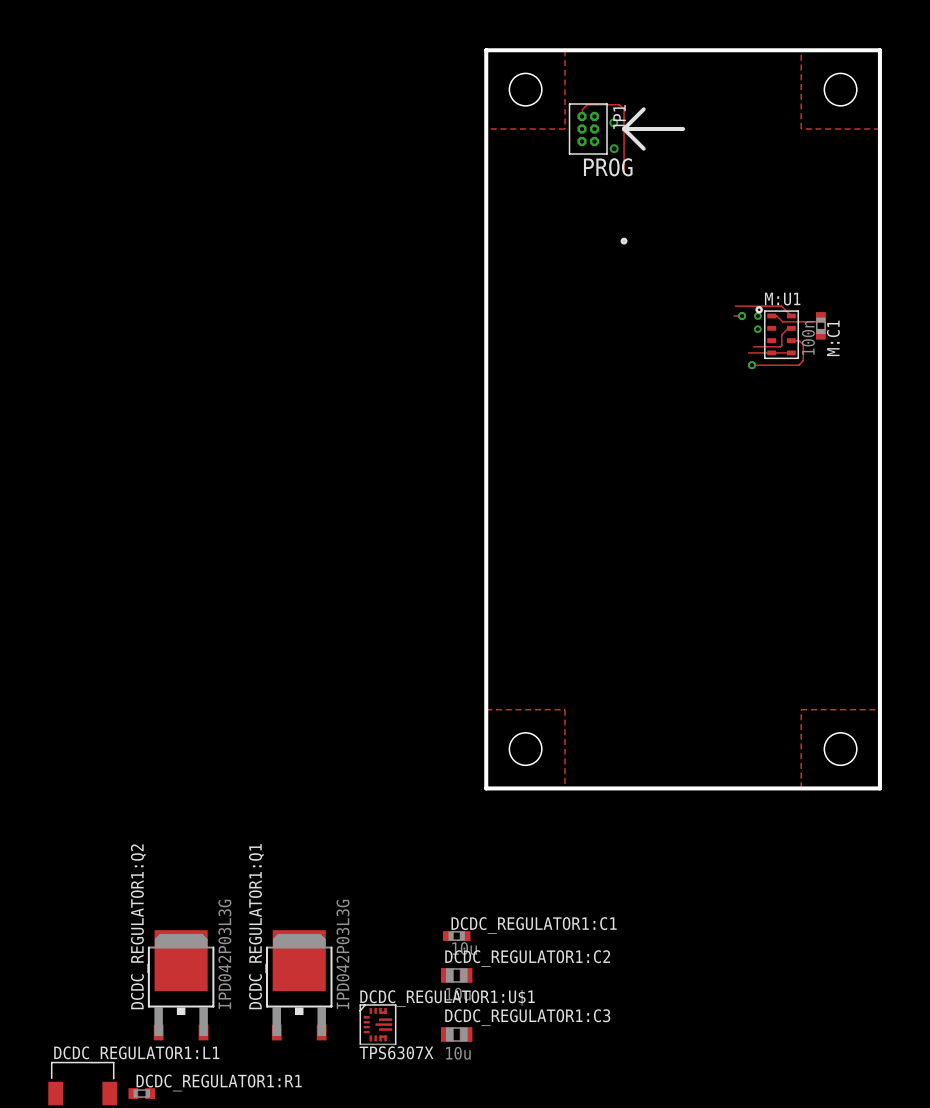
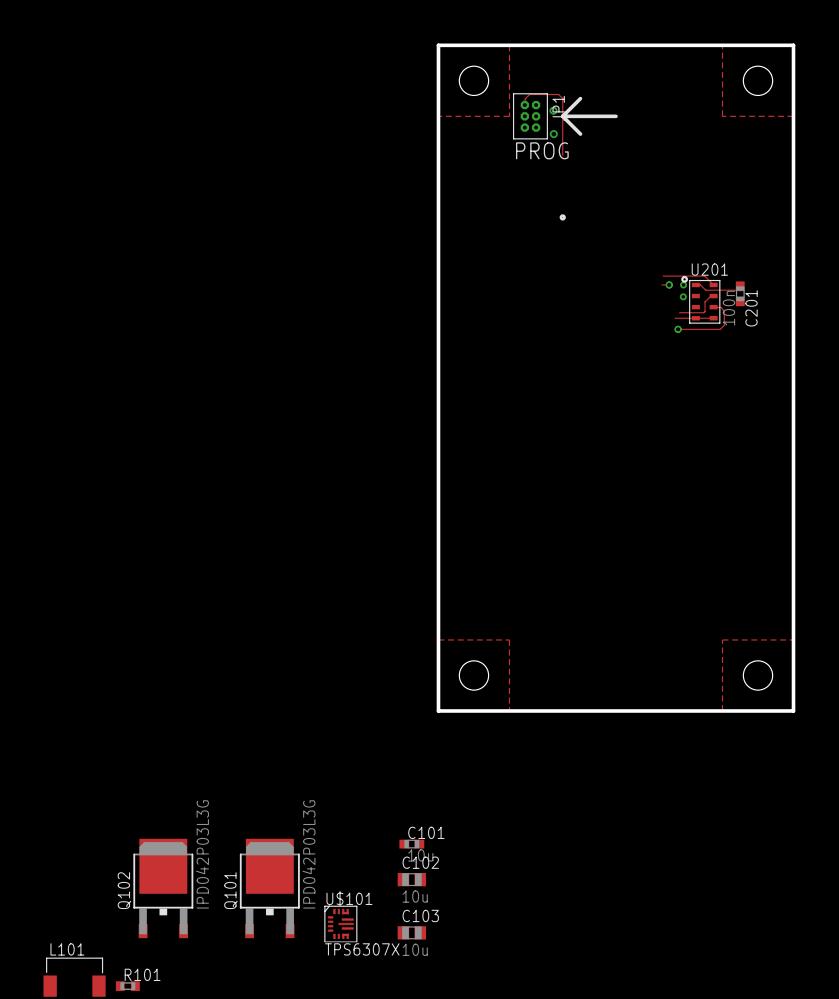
U201 name: M:U1 (782, 299) -> U201 (709, 269)
C201 name: M:C1 (833, 338) -> C201 (751, 308)
C101 name: DCDC_REGULATOR1:C1 (534, 925) -> C101 (426, 832)
Q102 name: DCDC_REGULATOR1:Q2 (139, 926) -> Q102 (124, 890)
Q101 name: DCDC_REGULATOR1:Q1 (257, 926) -> Q101 (230, 890)
C102 name: DCDC_REGULATOR1:C2 (527, 958) -> C102 (420, 862)
U$101 name: DCDC_REGULATOR1:U$1 (447, 998) -> U$101 (349, 898)
C103 name: DCDC_REGULATOR1:C3 (527, 1017) -> C103 (420, 915)
L101 name: DCDC_REGULATOR1:L1 (136, 1054) -> L101 (67, 949)
R101 name: DCDC_REGULATOR1:R1 (219, 1082) -> R101 (142, 974)

